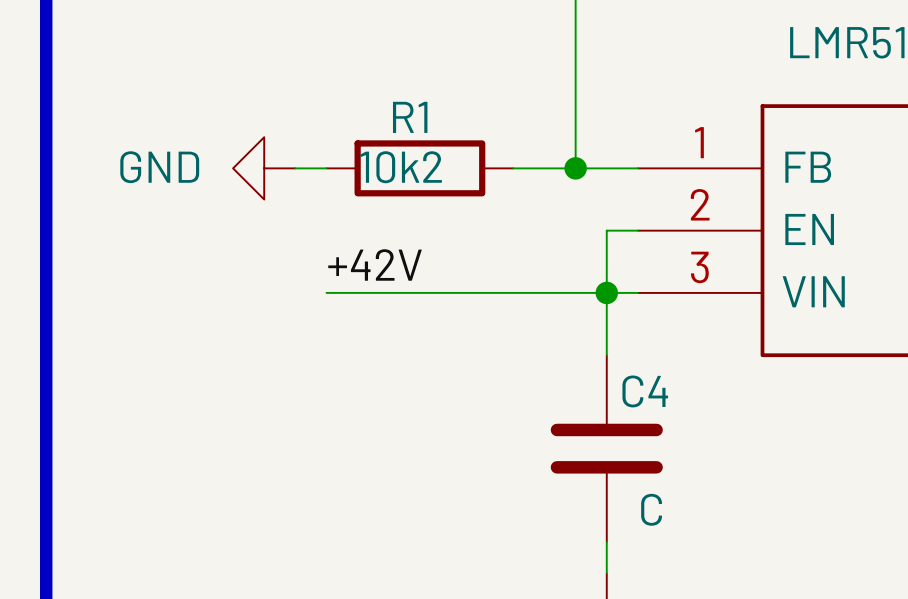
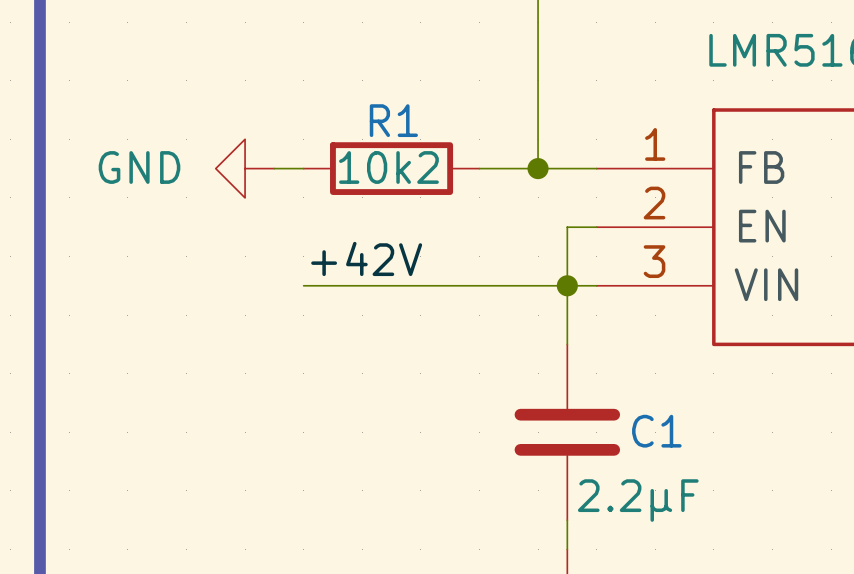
C4 name: C4 (645, 391) -> C1 (656, 431)
C4 value: C (651, 509) -> 2.2µF (638, 500)

